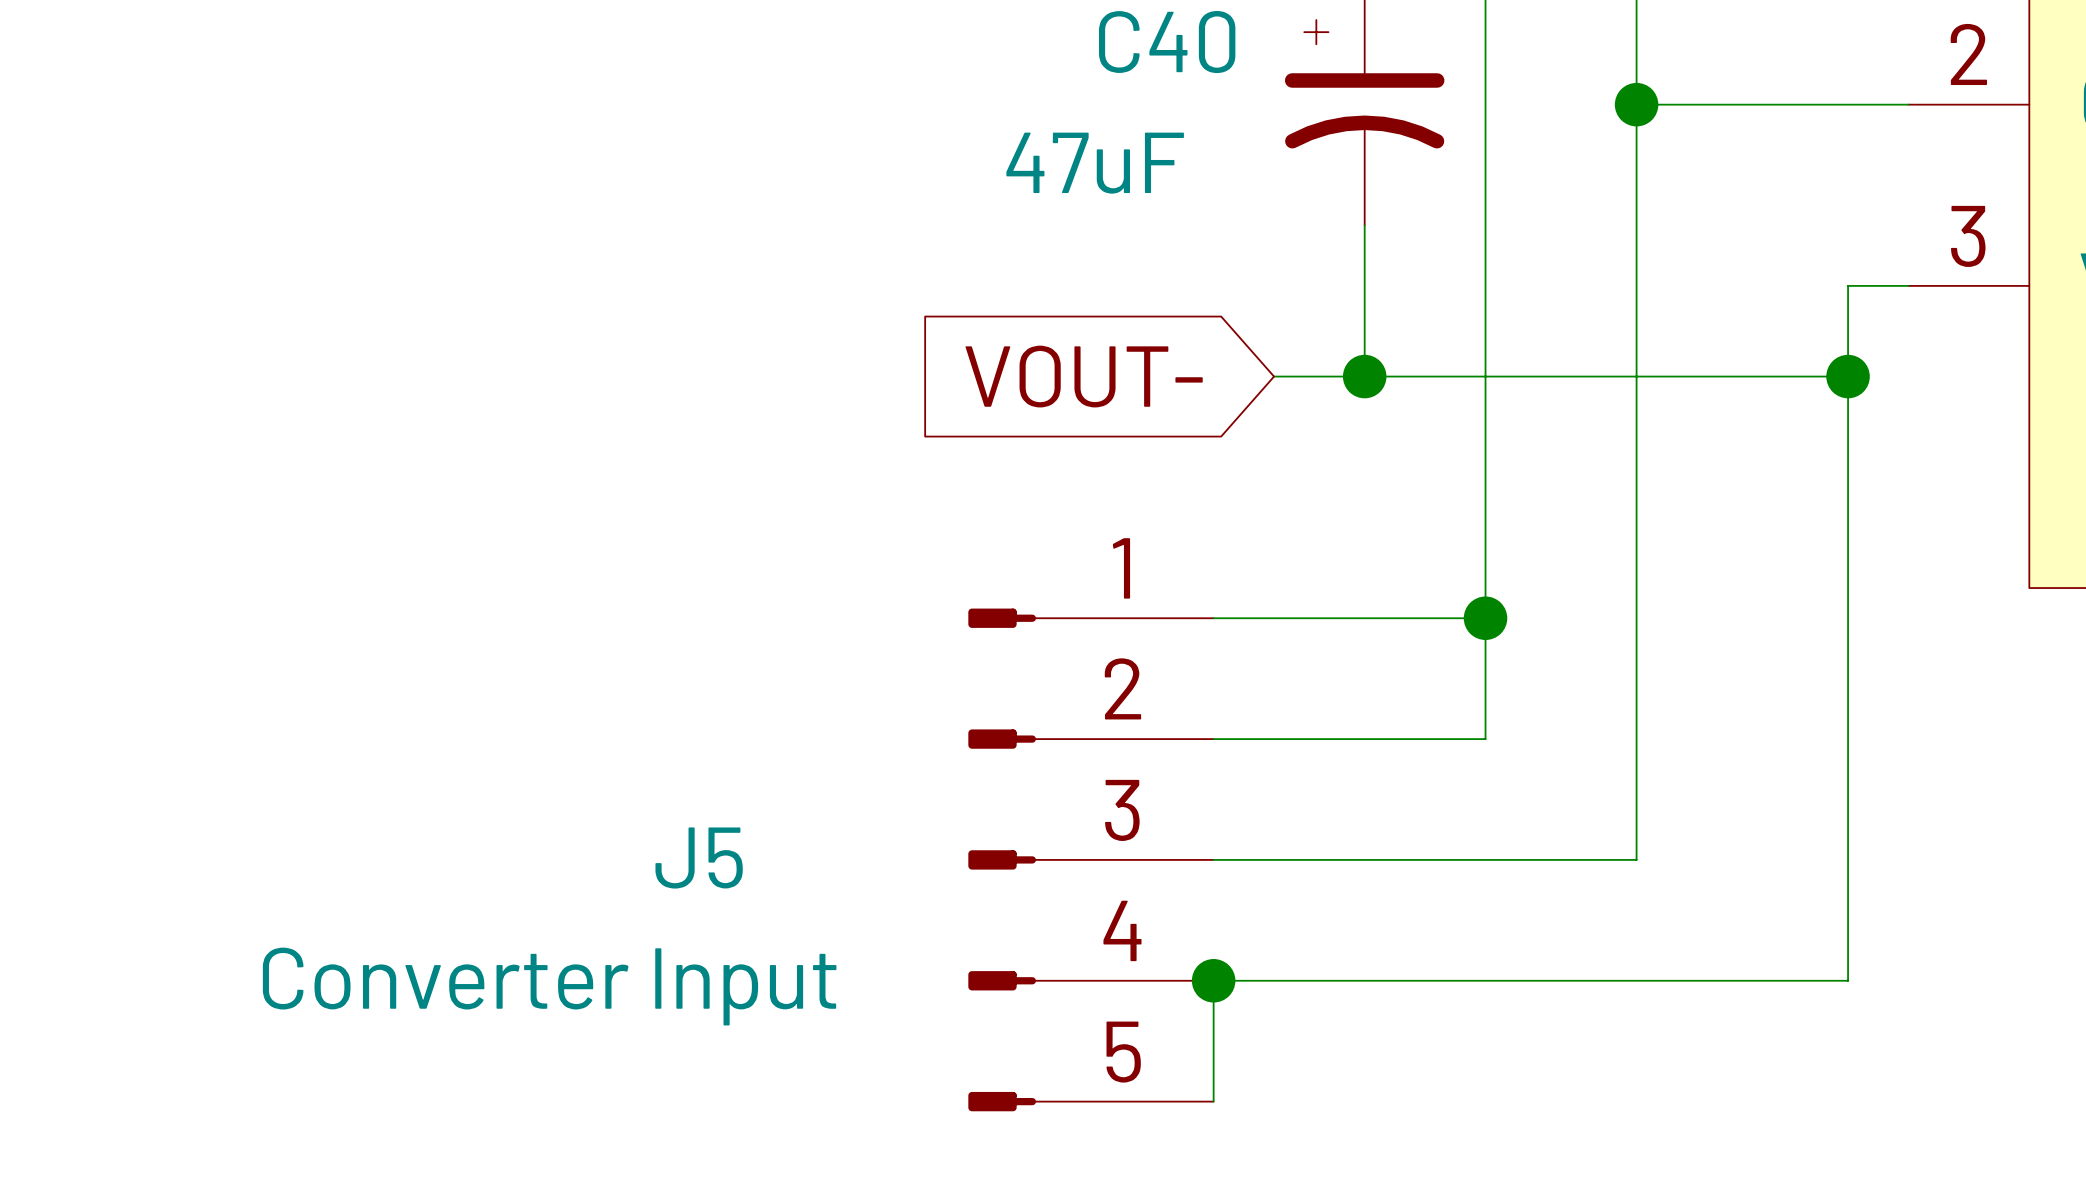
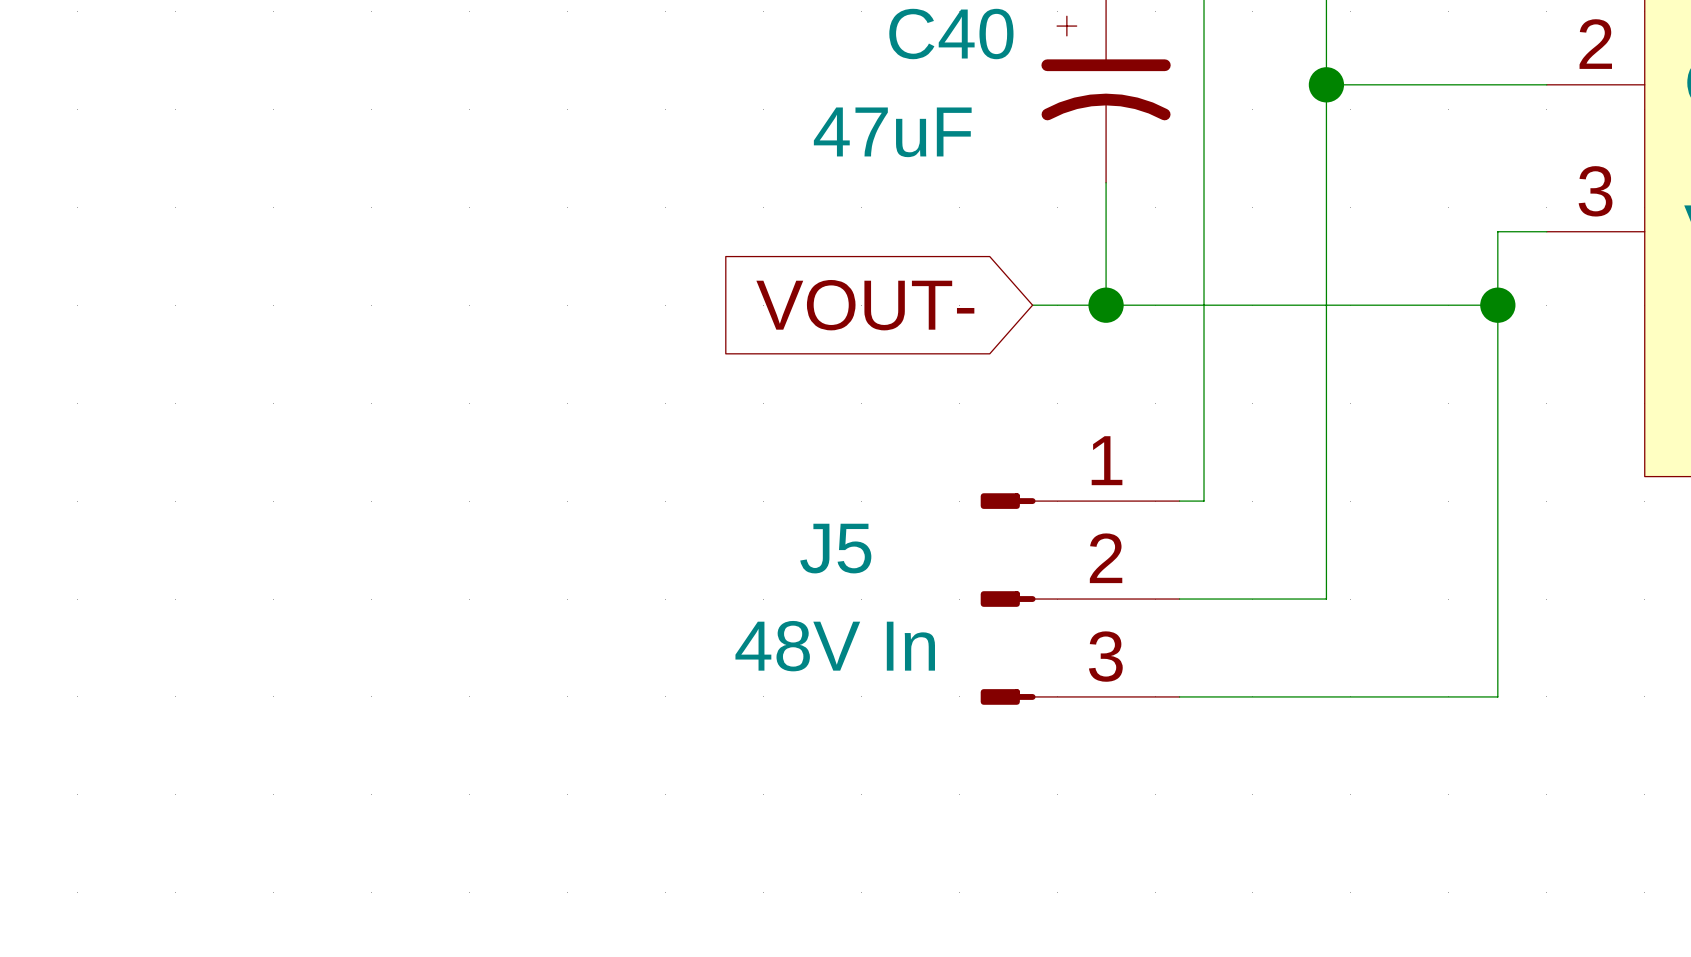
J5 symbol: [968, 608, 1214, 1112] -> [980, 493, 1180, 705]
wire: (1485, 618) (1485, 739) -> none
junction: (1485, 618) -> none
wire: (1636, 739) (1636, 859) -> (1326, 599) (1204, 599)
J5 name position: J5 (699, 858) -> J5 (835, 548)
wire: (1848, 859) (1848, 980) (1213, 980) (1213, 1101) -> (1497, 696) (1326, 696)
junction: (1213, 980) -> none
J5 value: Converter Input (549, 986) -> 48V In (835, 646)

